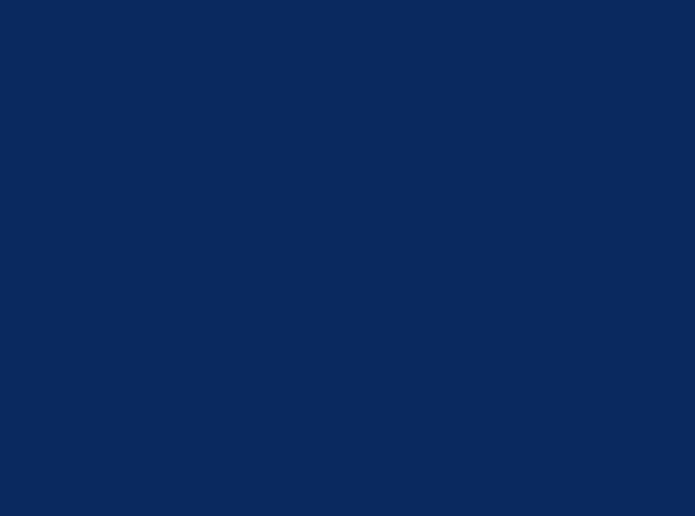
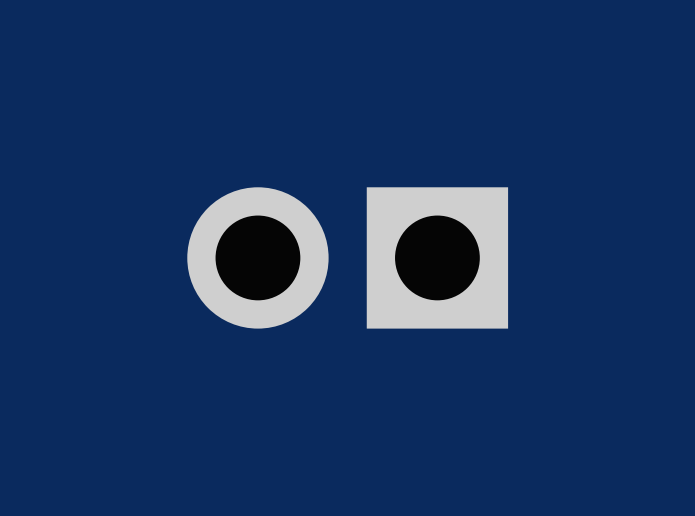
part: none -> (347, 257)

